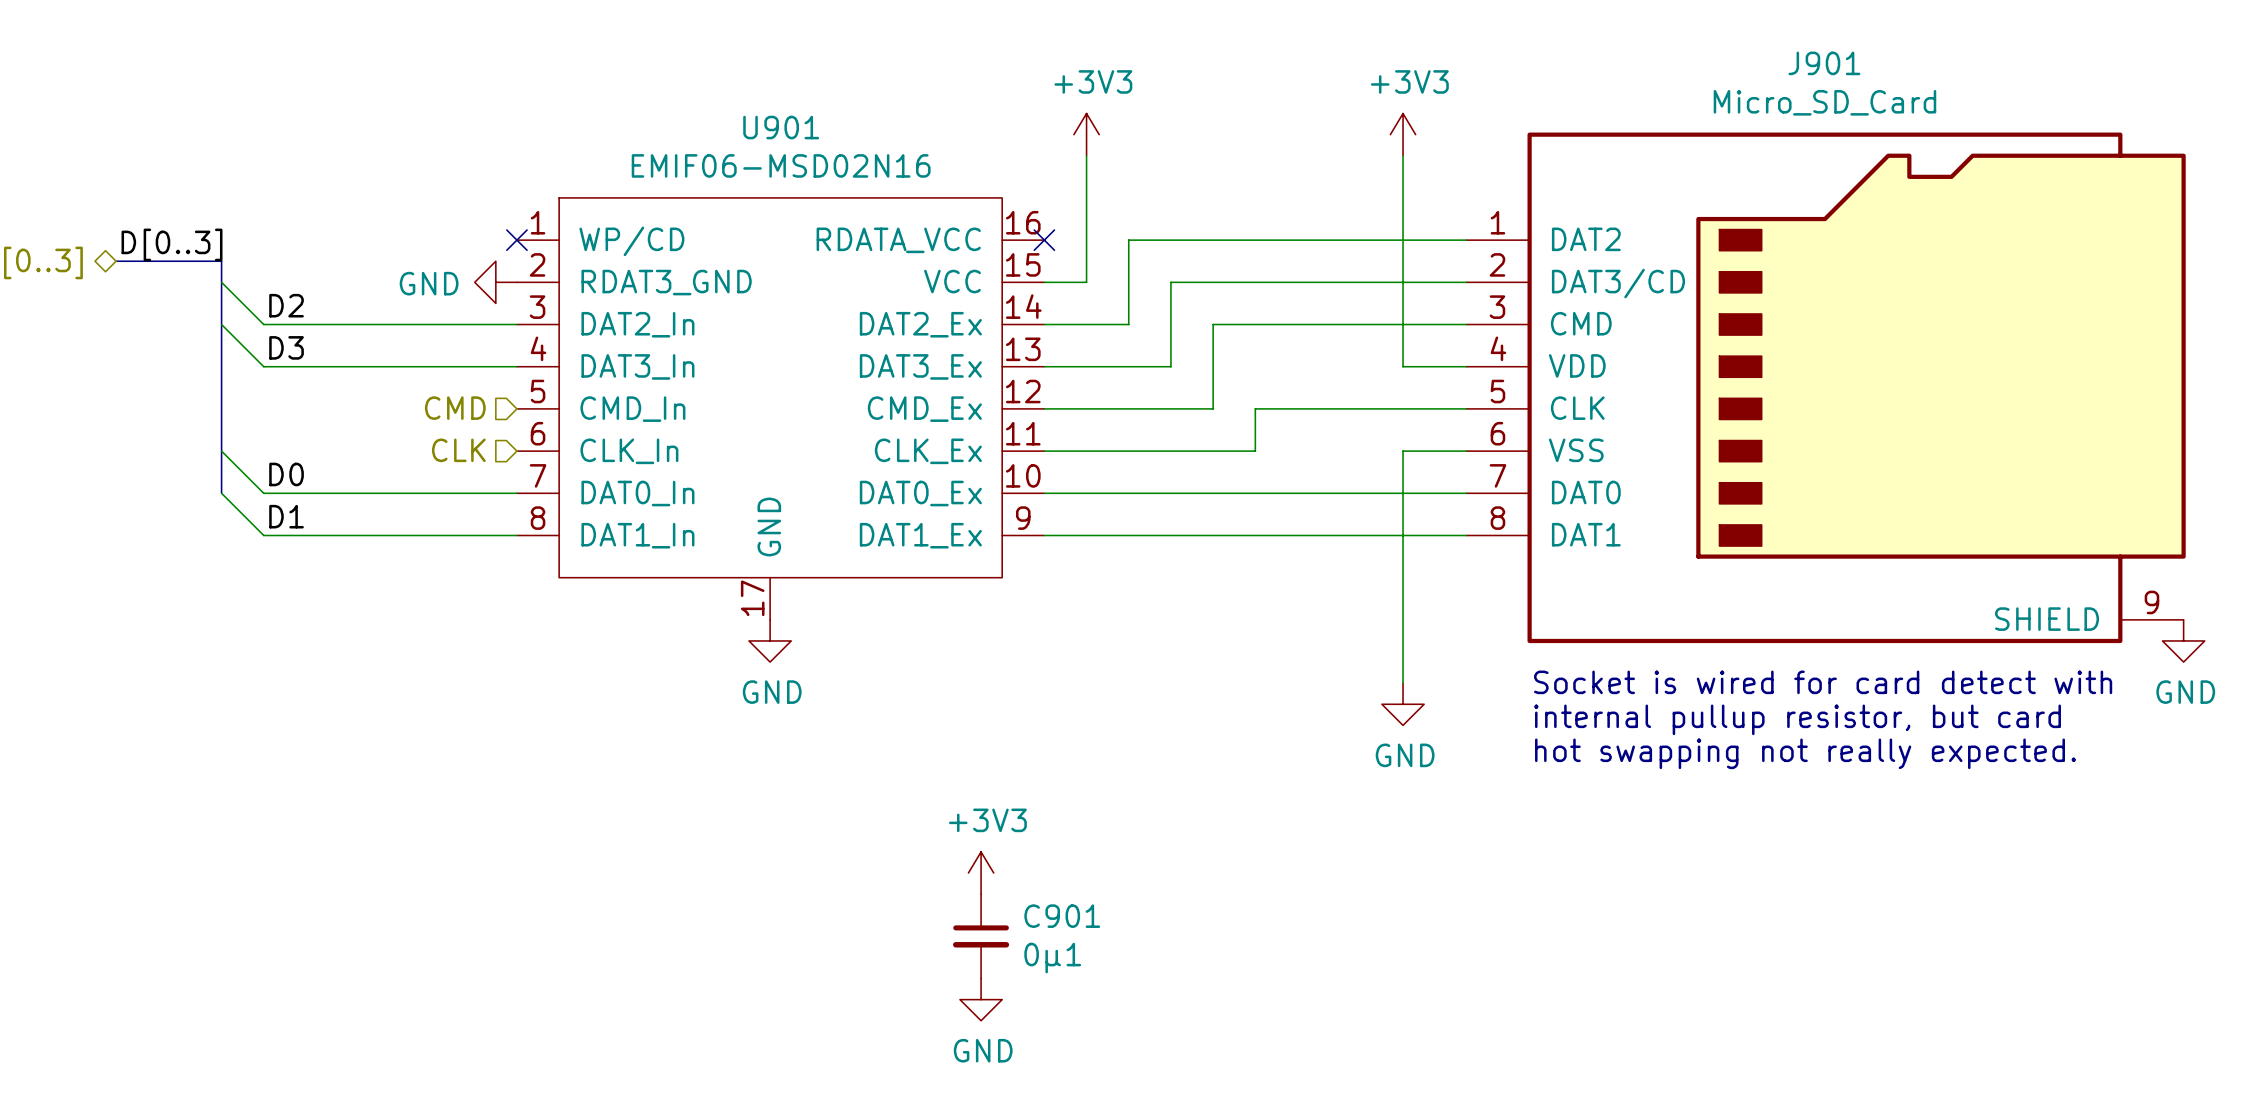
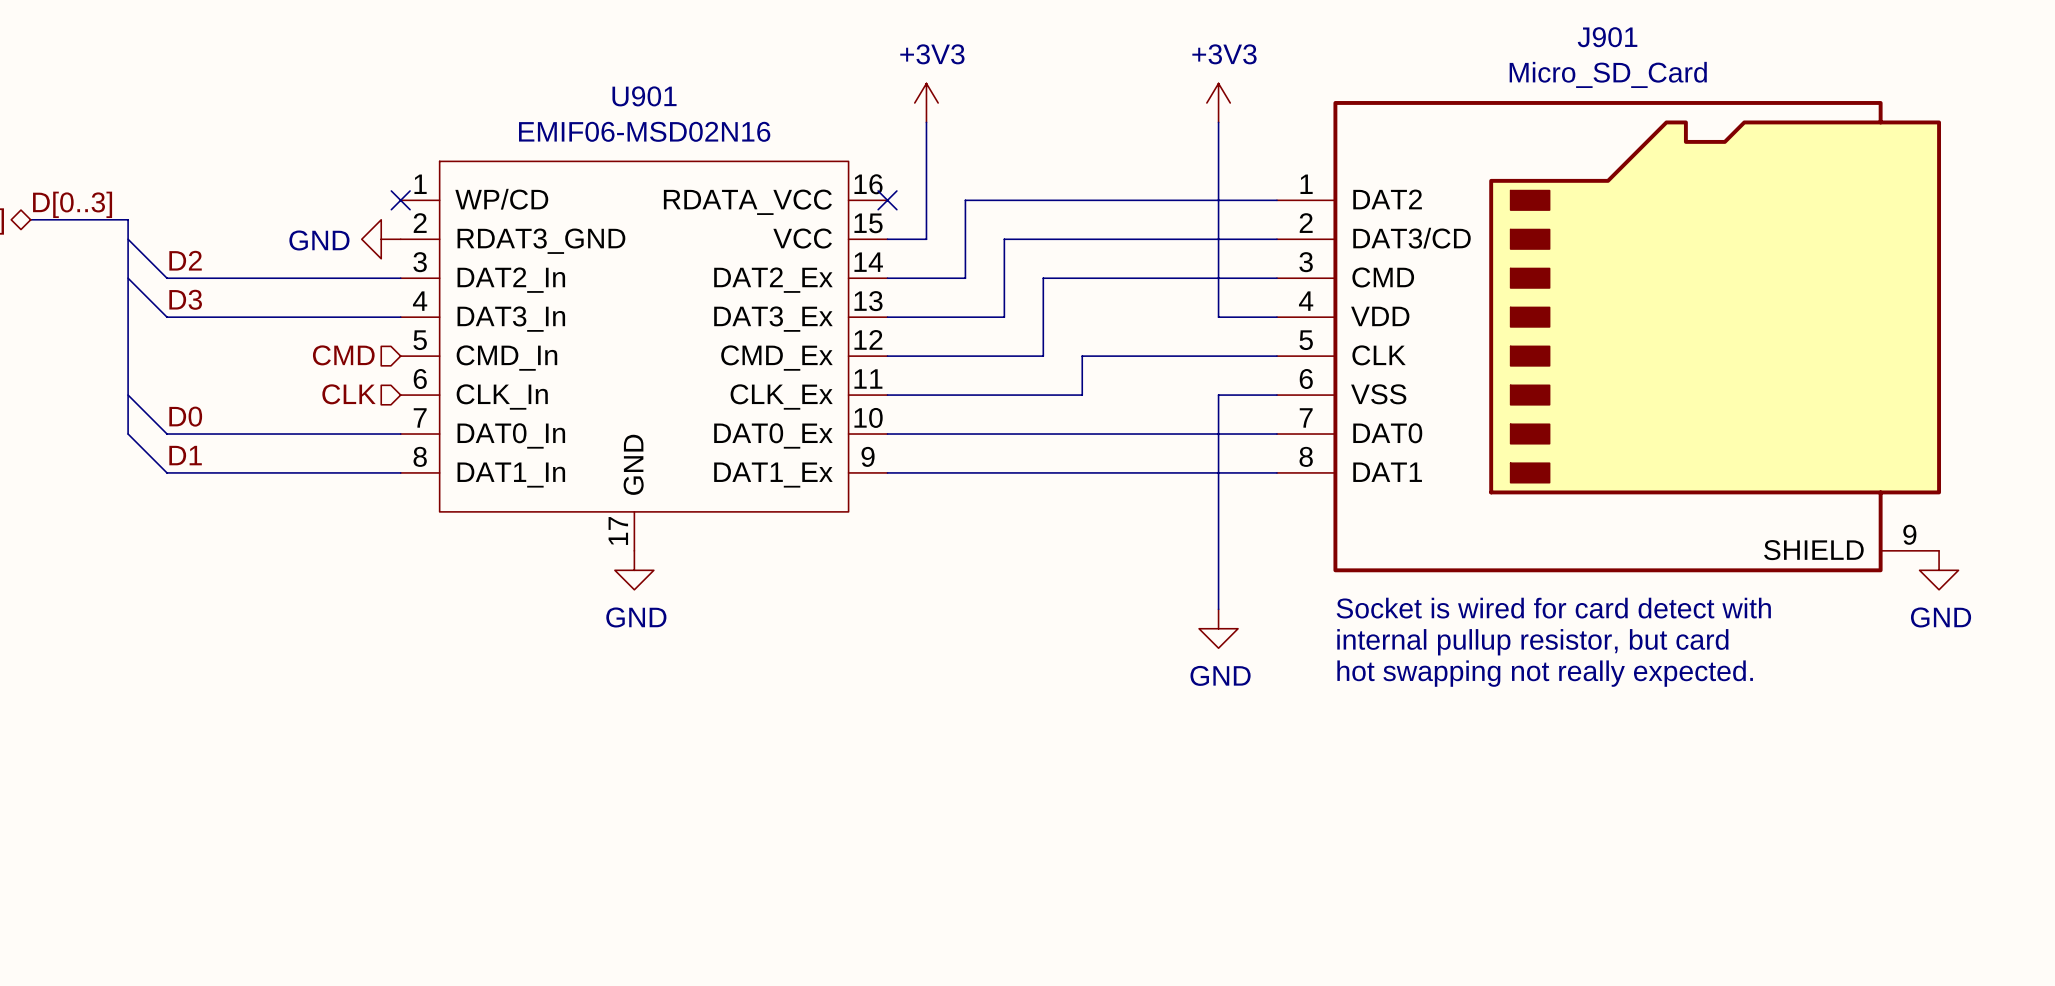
power symbol: +3V3 (981, 873) -> none
C901: 0µ1 (981, 936) -> none
power symbol: GND (981, 999) -> none

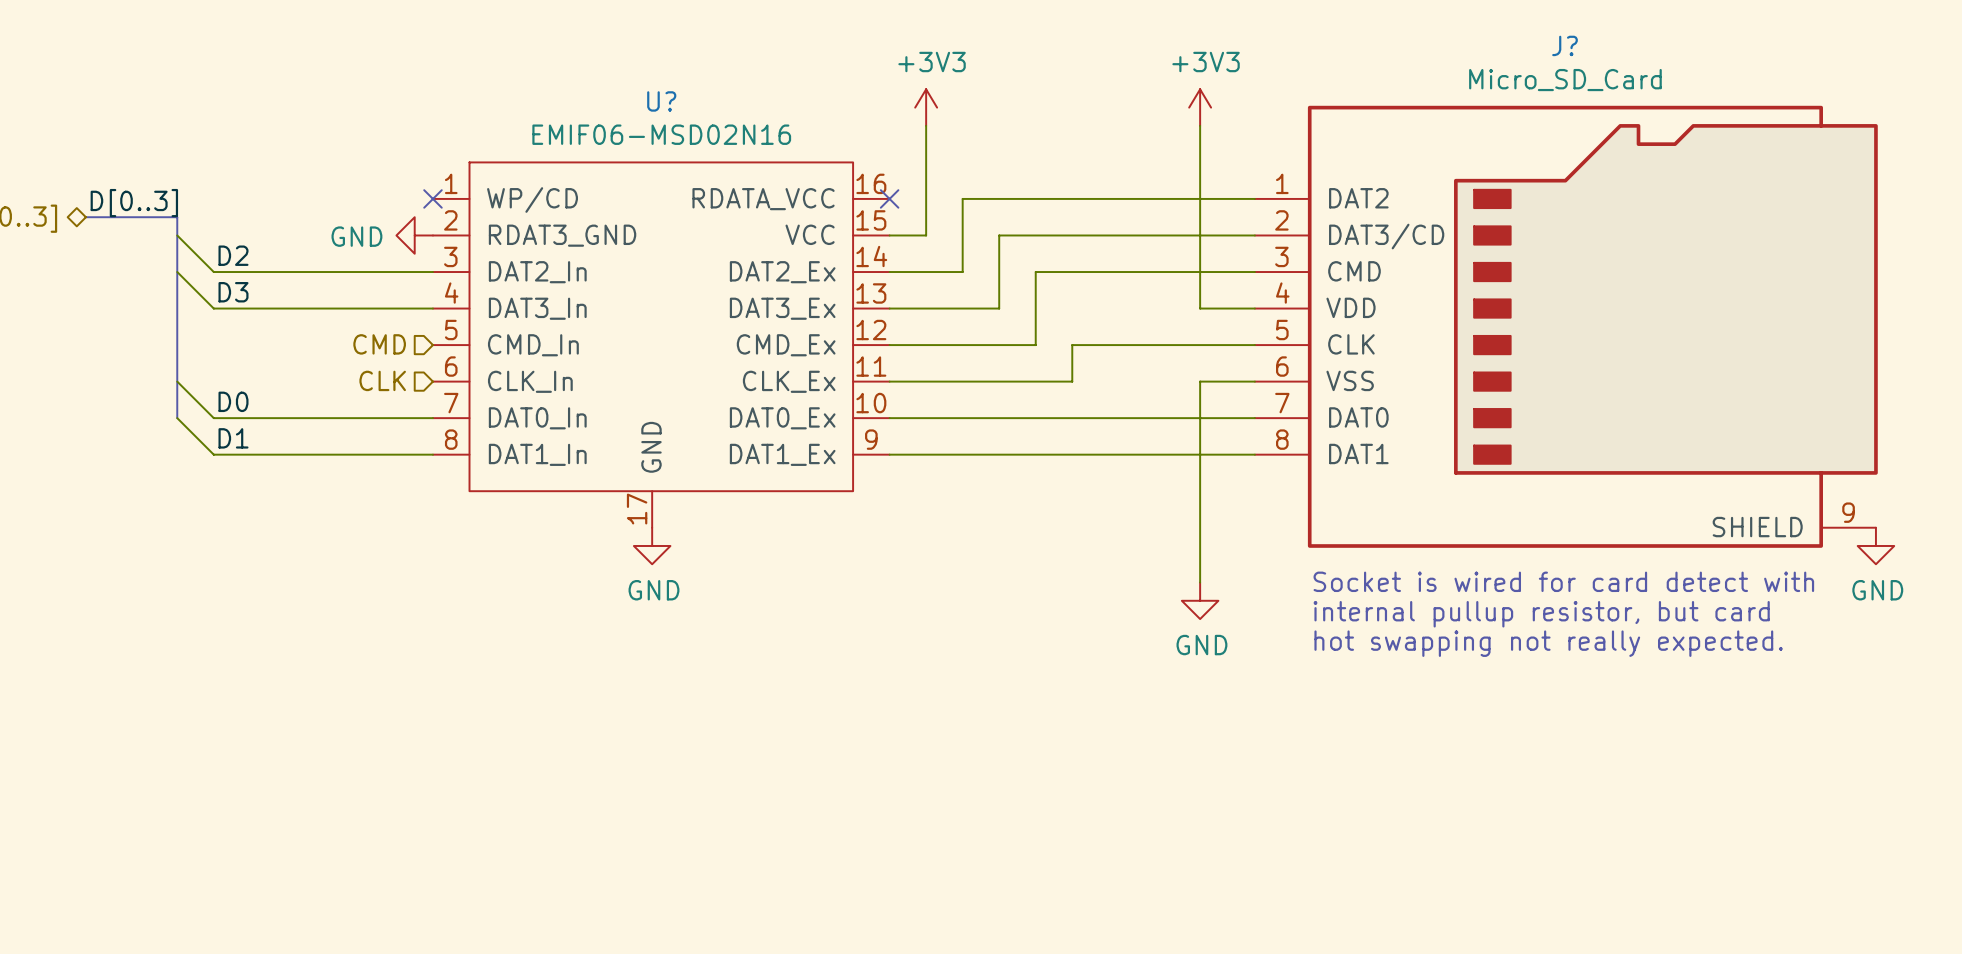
J901 name: J901 (1607, 37) -> J? (1565, 45)
U901 name: U901 (644, 96) -> U? (661, 101)

